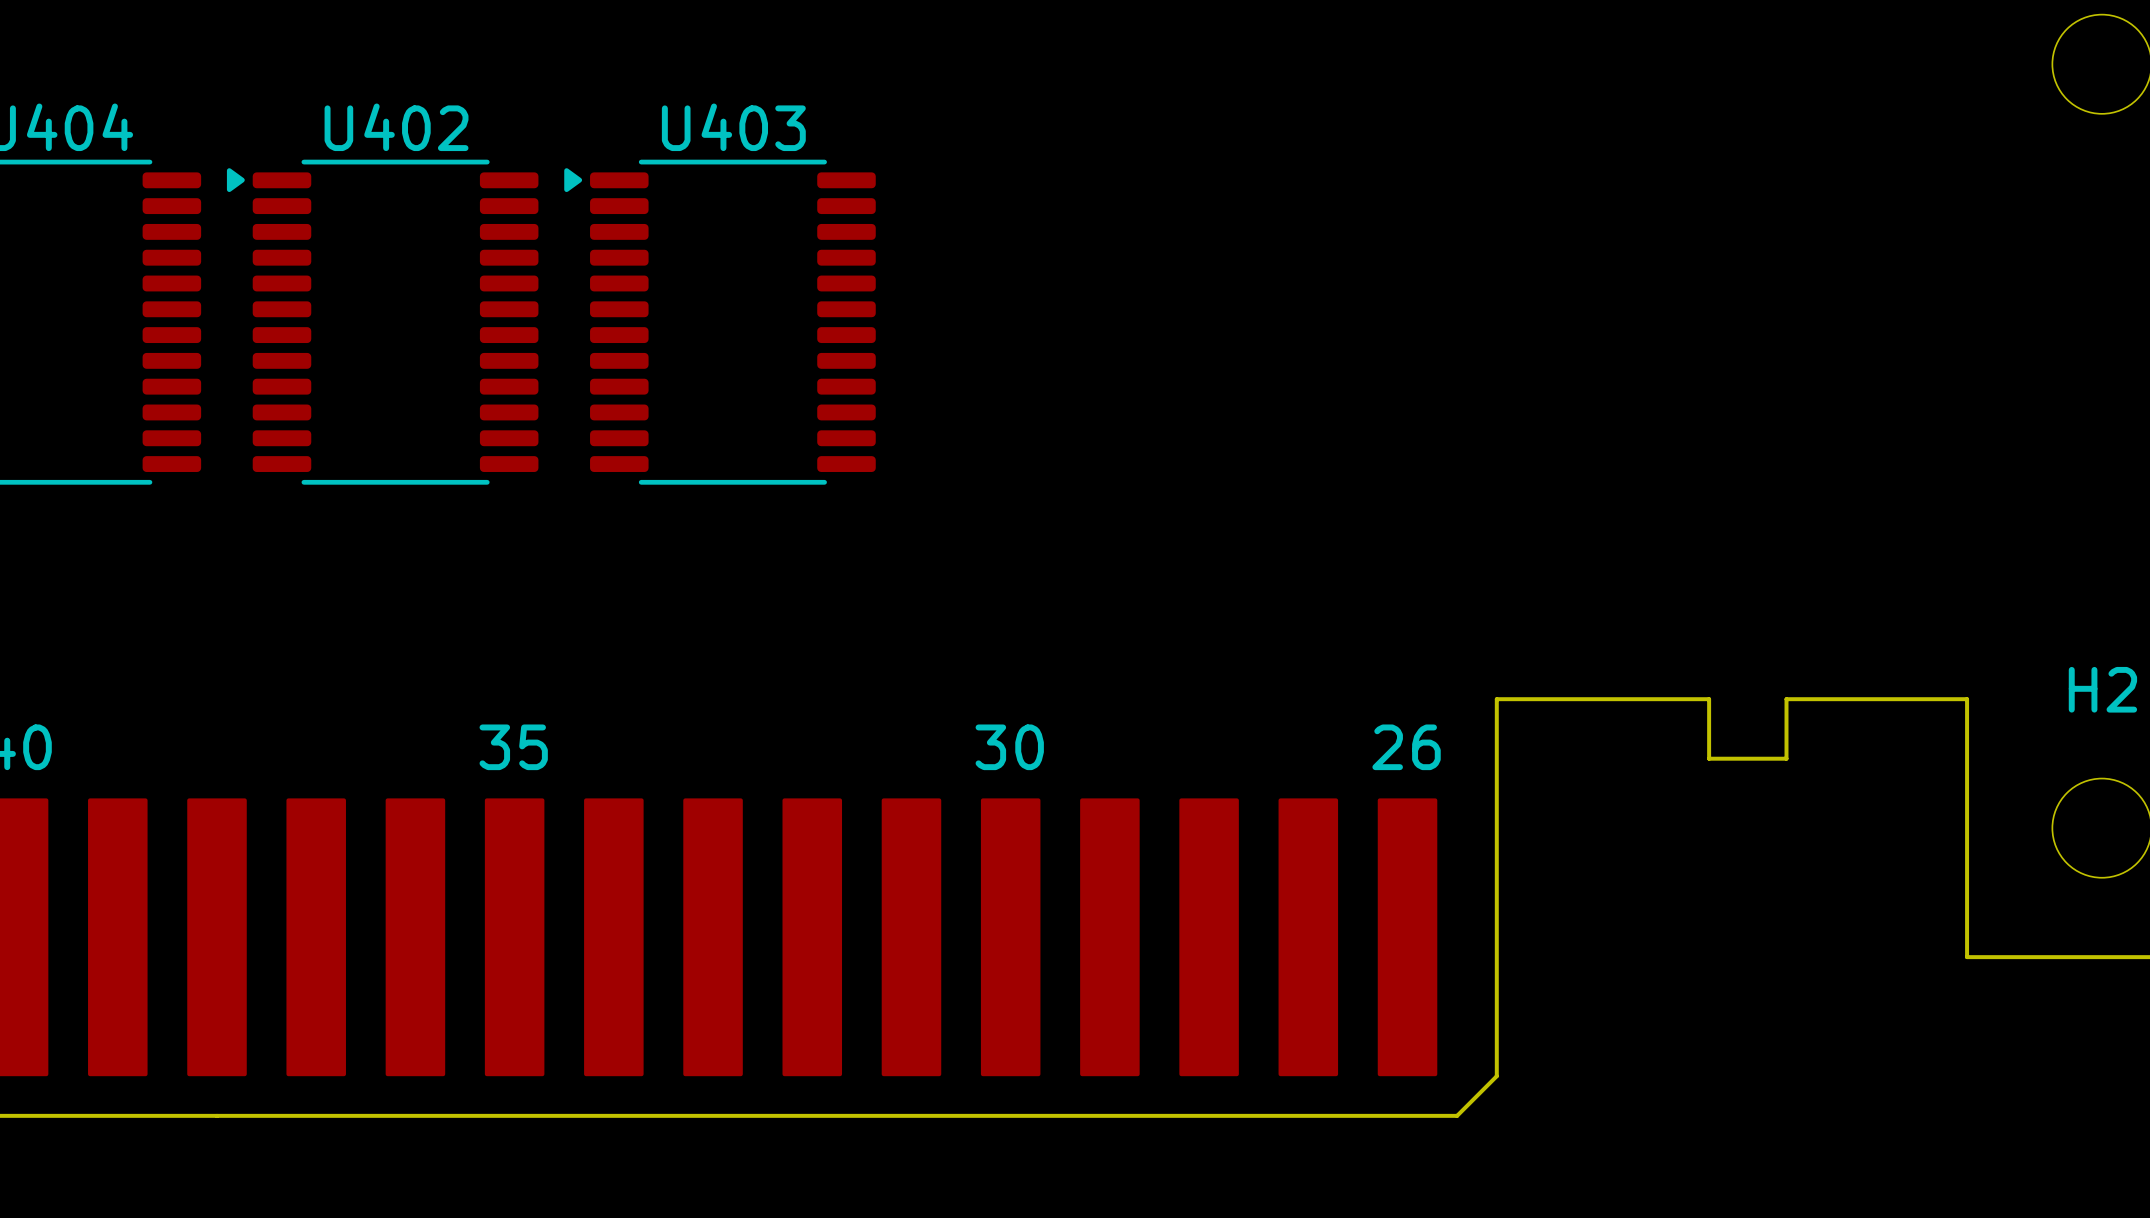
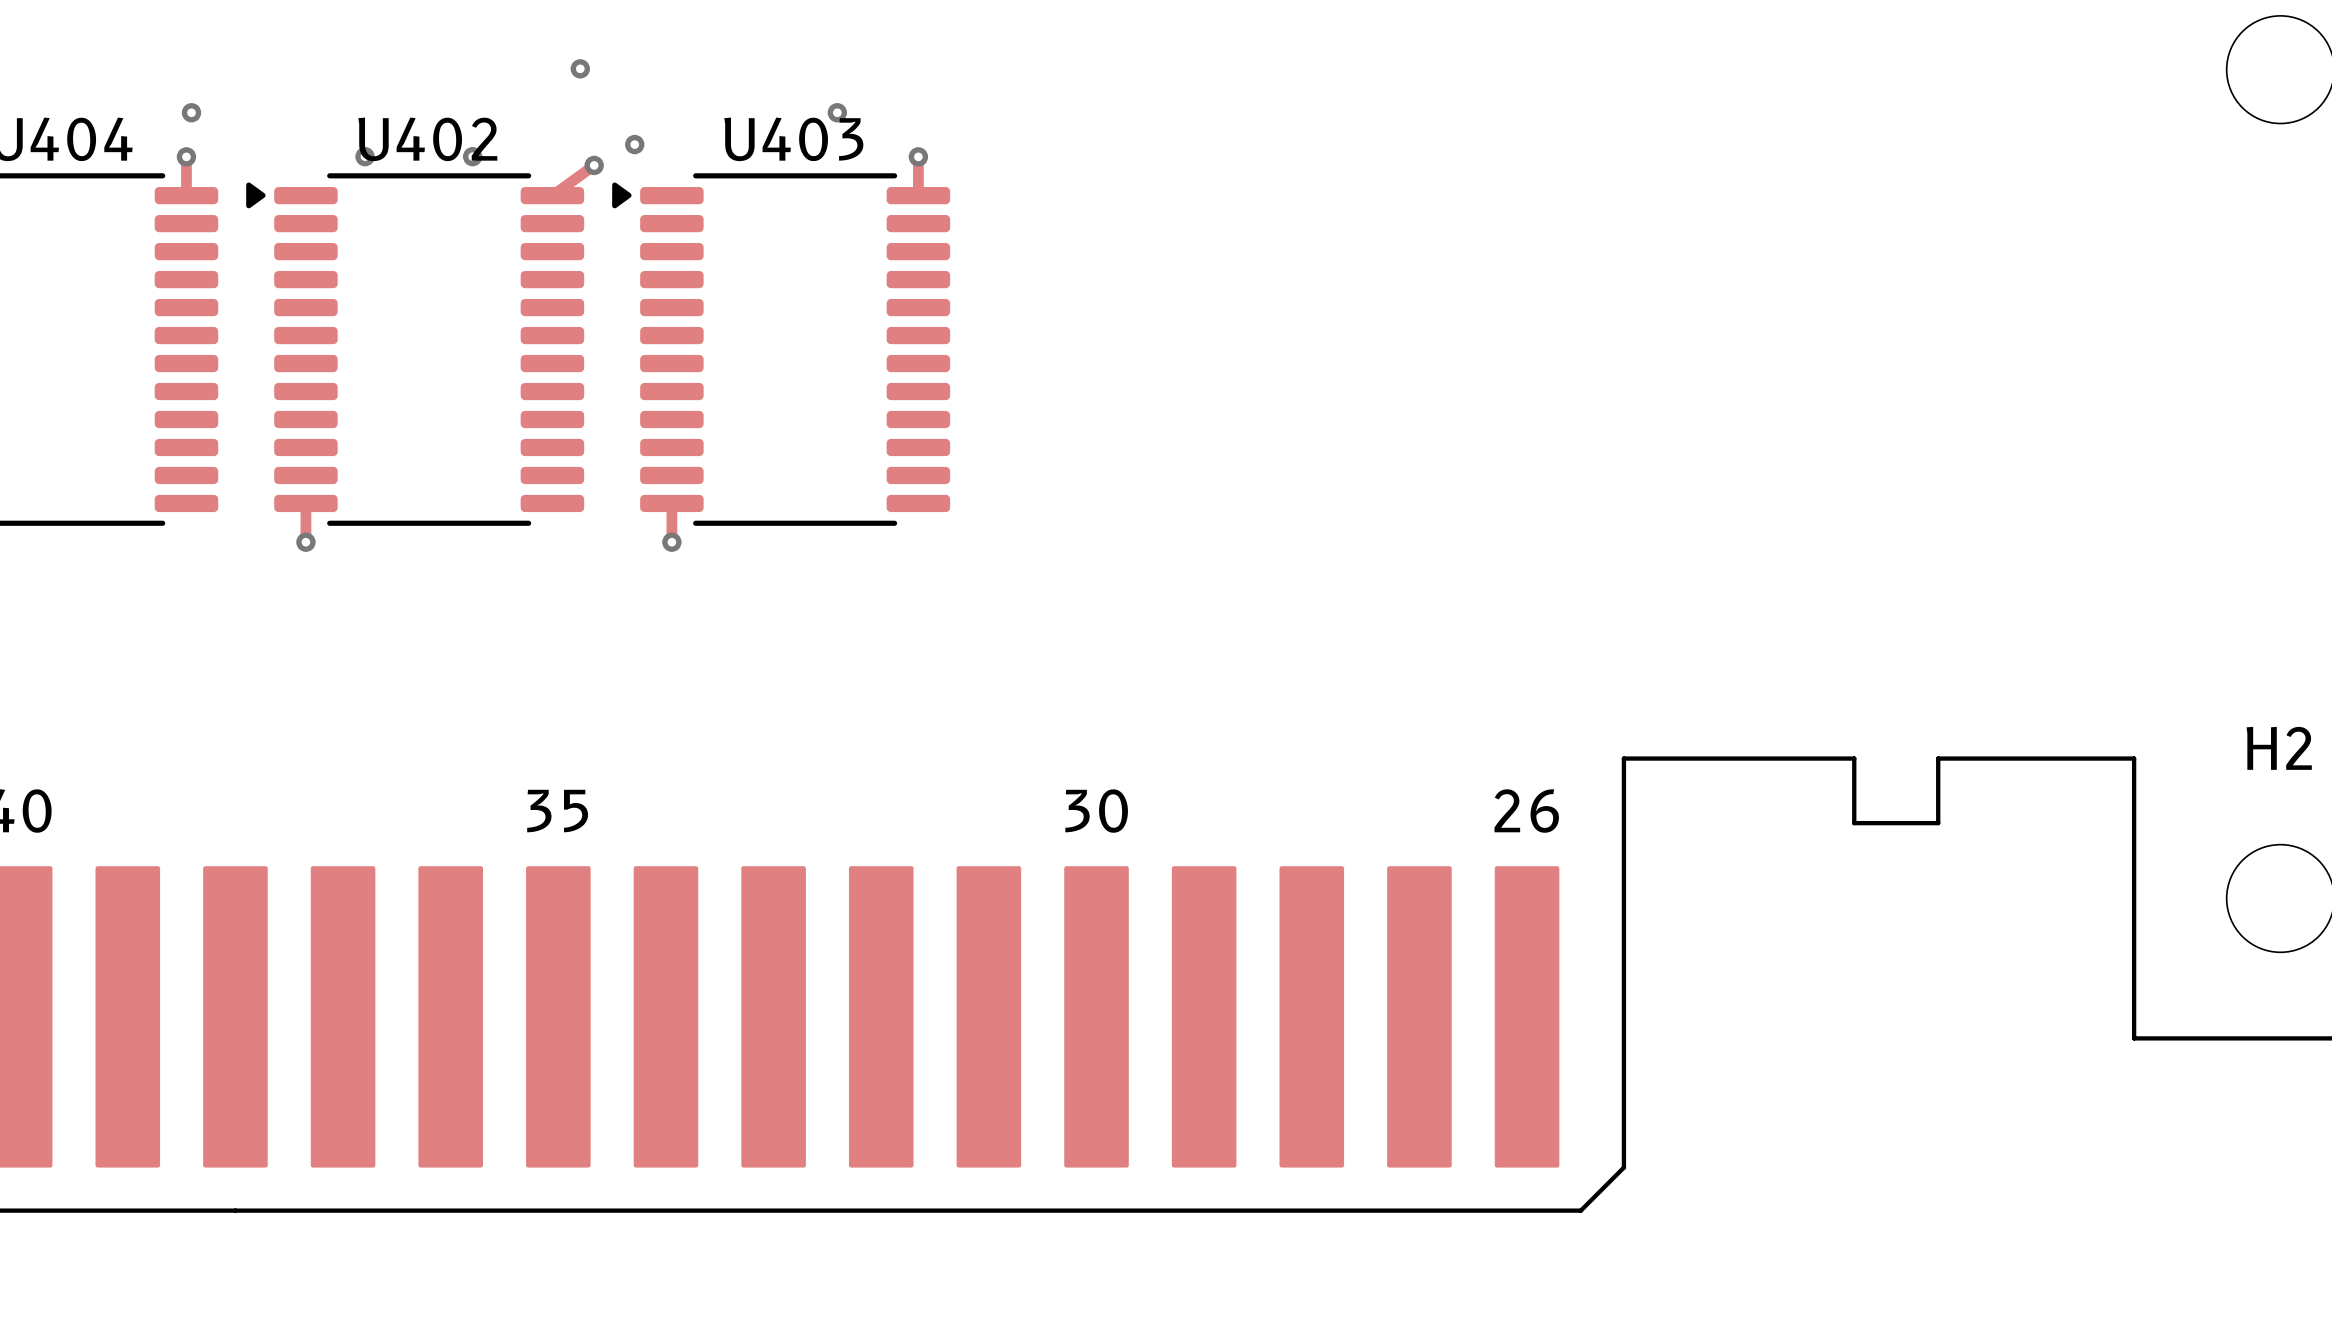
via: none -> (580, 68)
via: none -> (191, 112)
via: none -> (837, 112)
via: none -> (634, 144)
track: none -> (186, 156) (186, 195)
via: none -> (186, 156)
via: none -> (365, 156)
via: none -> (472, 156)
track: none -> (918, 156) (918, 195)
via: none -> (918, 156)
track: none -> (594, 165) (552, 195)
via: none -> (594, 165)
track: none -> (305, 503) (305, 542)
track: none -> (671, 503) (671, 542)
via: none -> (305, 542)
via: none -> (671, 542)

